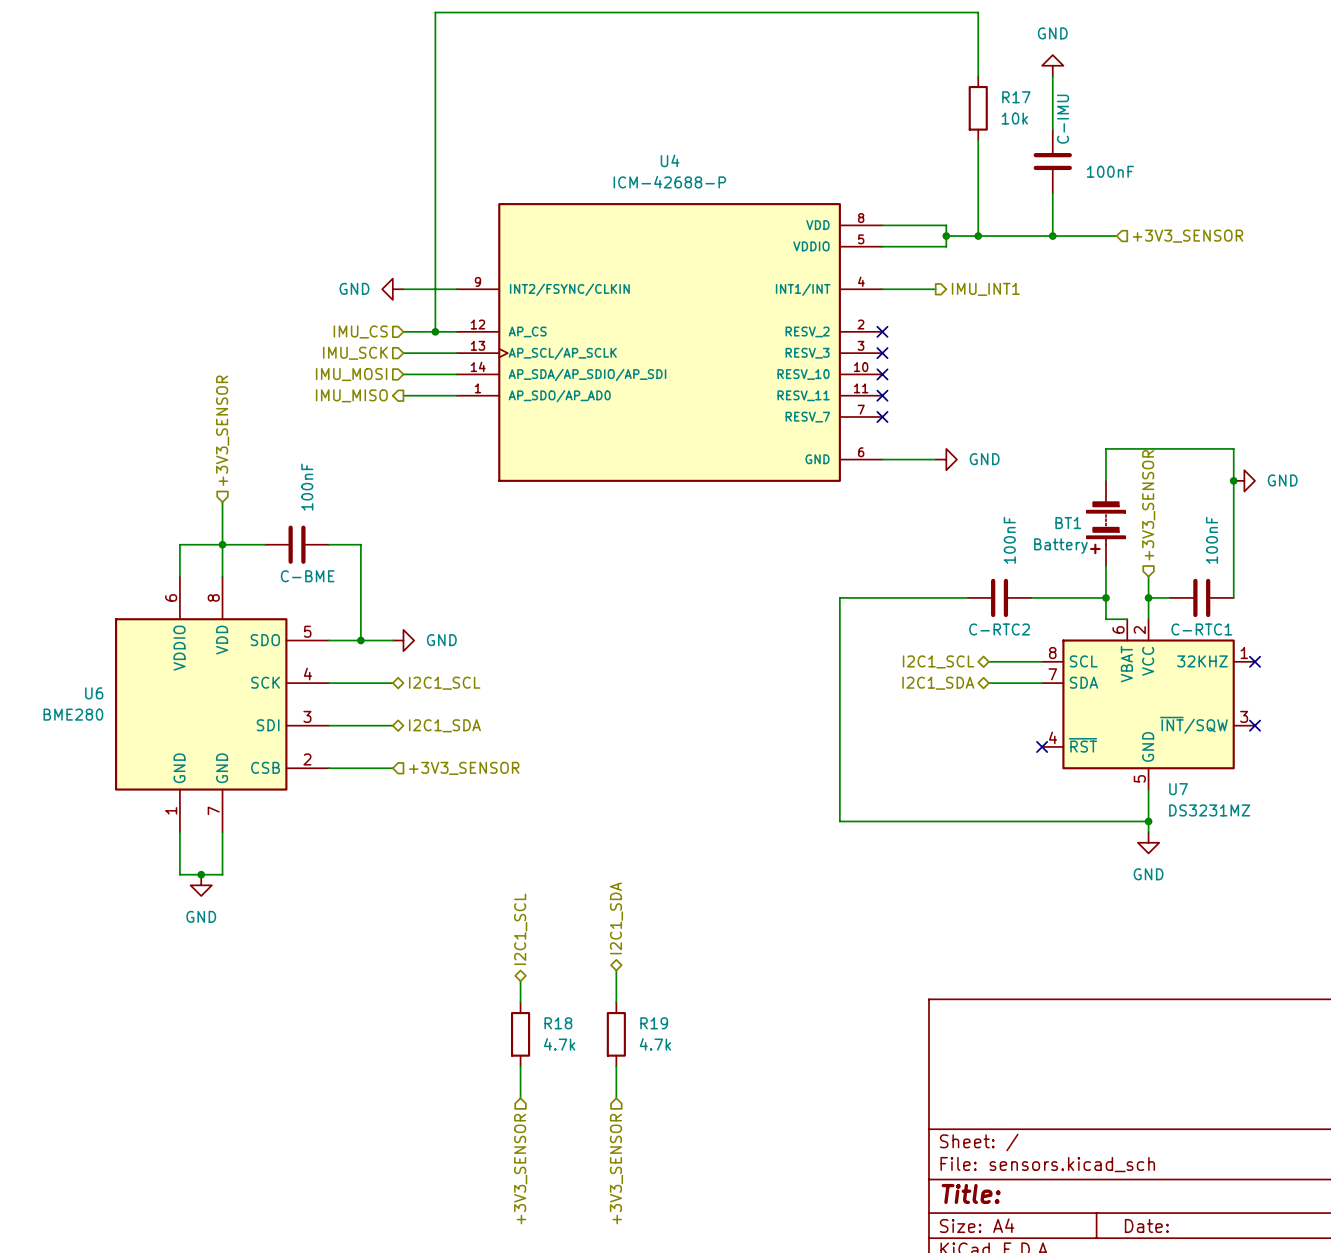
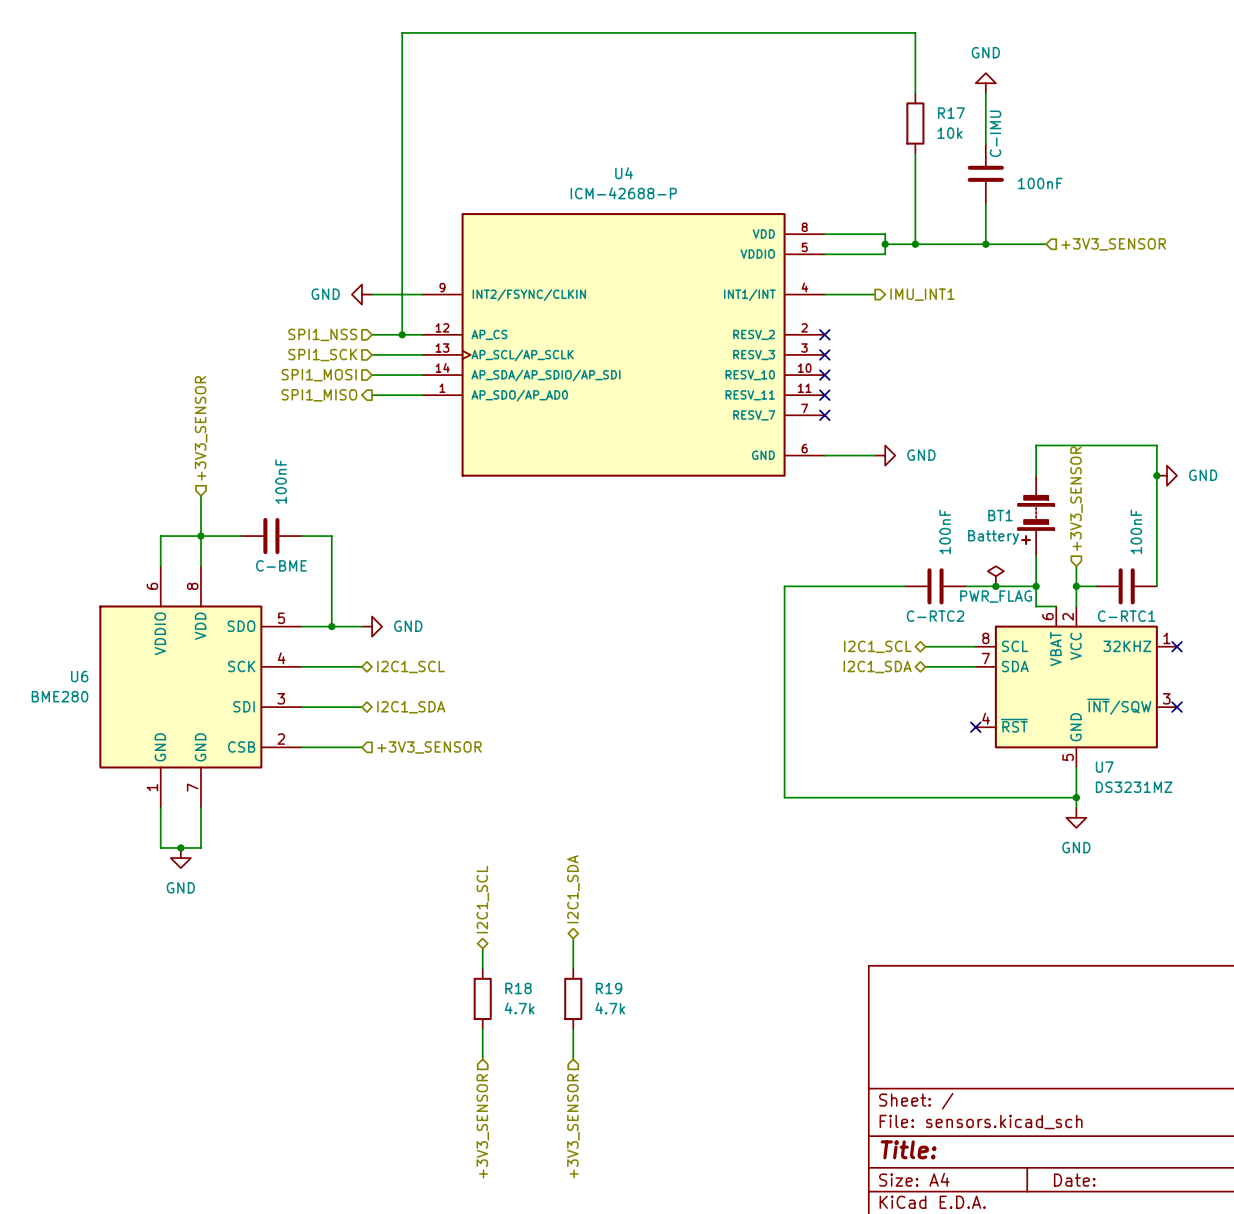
hierarchical label: IMU_CS (360, 331) -> SPI1_NSS (322, 334)
hierarchical label: IMU_SCK (355, 353) -> SPI1_SCK (322, 355)
hierarchical label: IMU_MOSI (351, 374) -> SPI1_MOSI (319, 375)
hierarchical label: IMU_MISO (351, 395) -> SPI1_MISO (319, 395)
power symbol: none -> PWR_FLAG (995, 576)
junction: none -> (995, 586)

